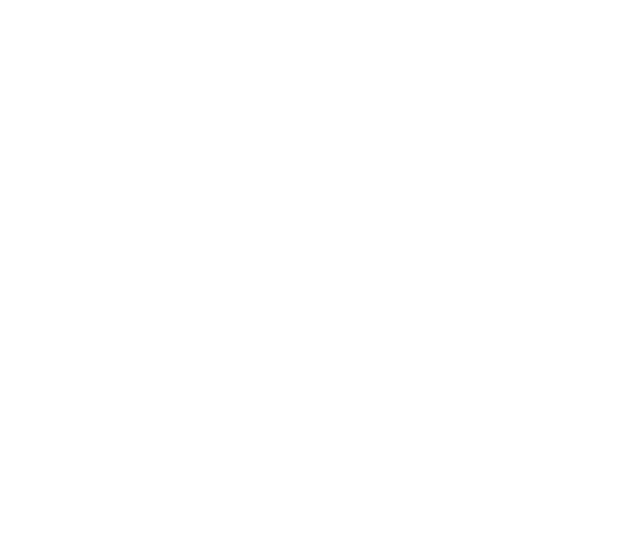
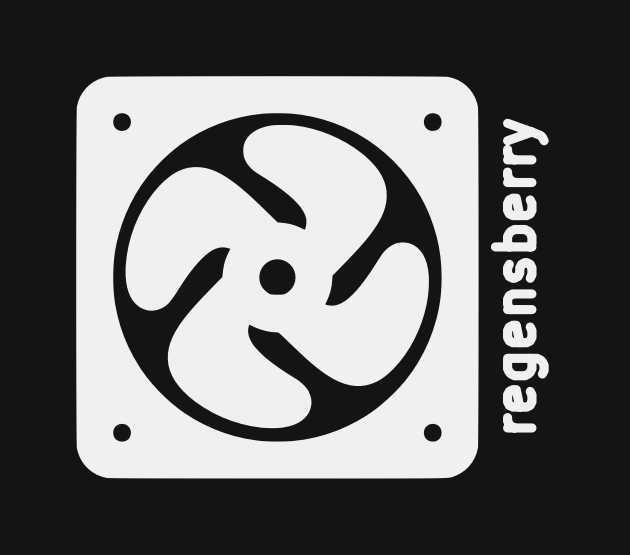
drawing: none -> [76, 76, 479, 479]
text: none -> regensberry (519, 275)

